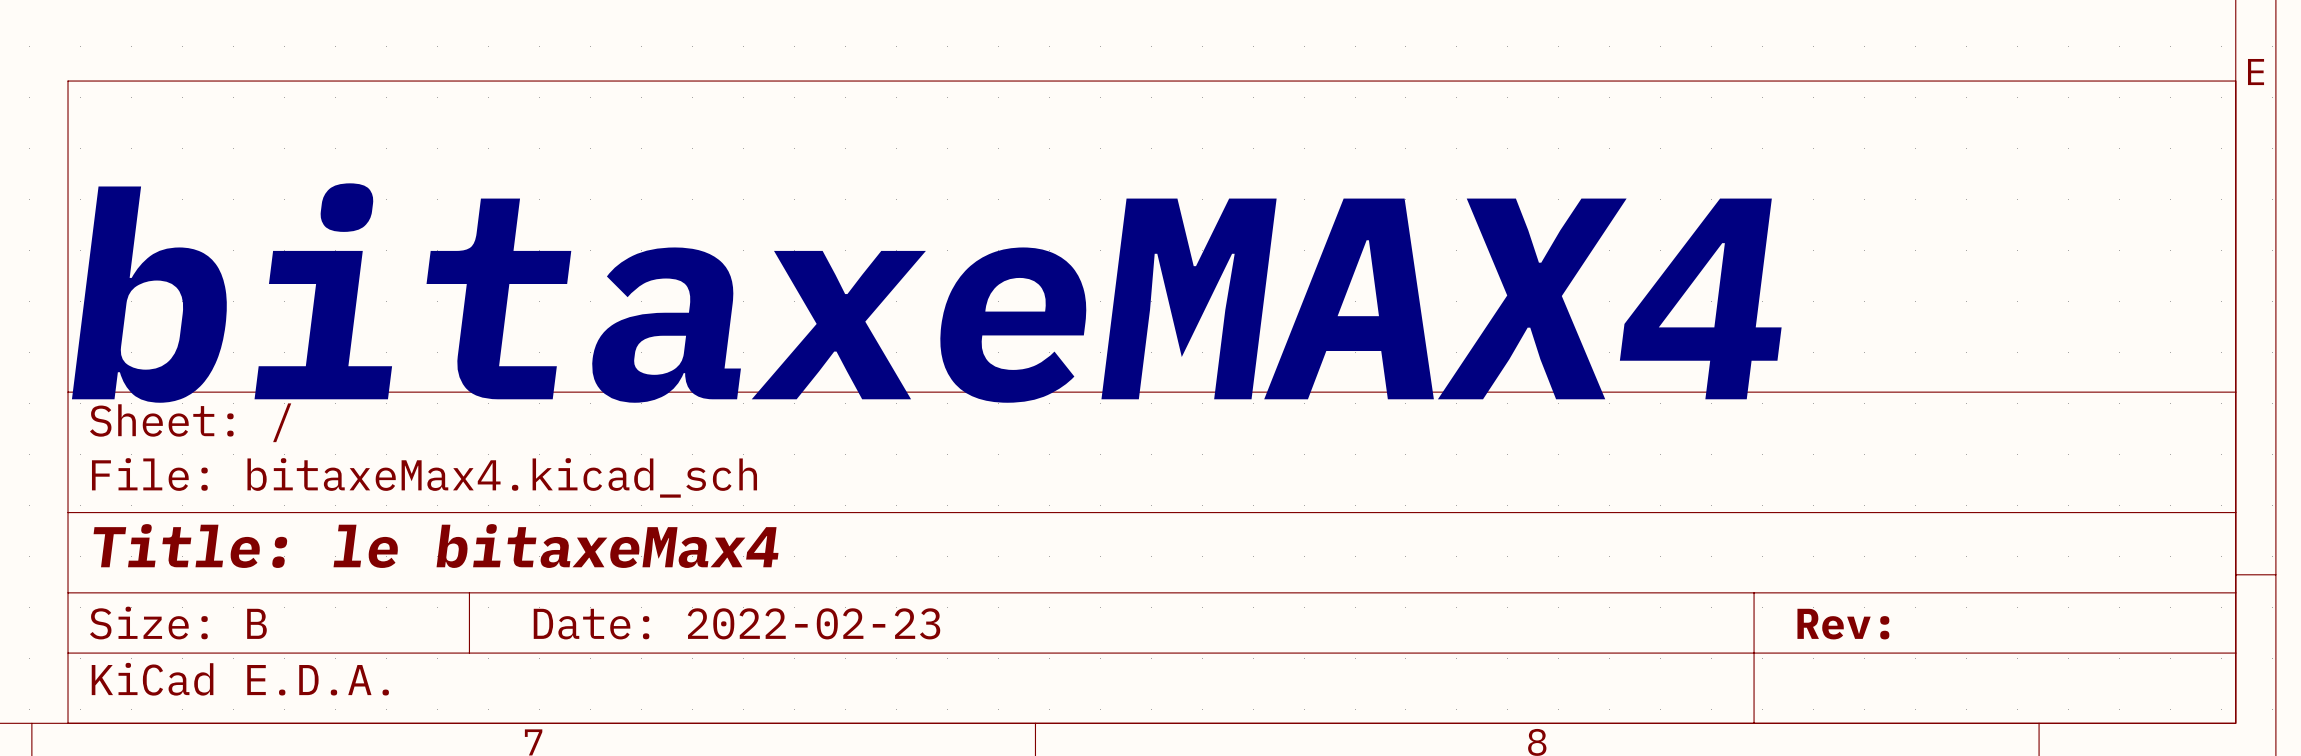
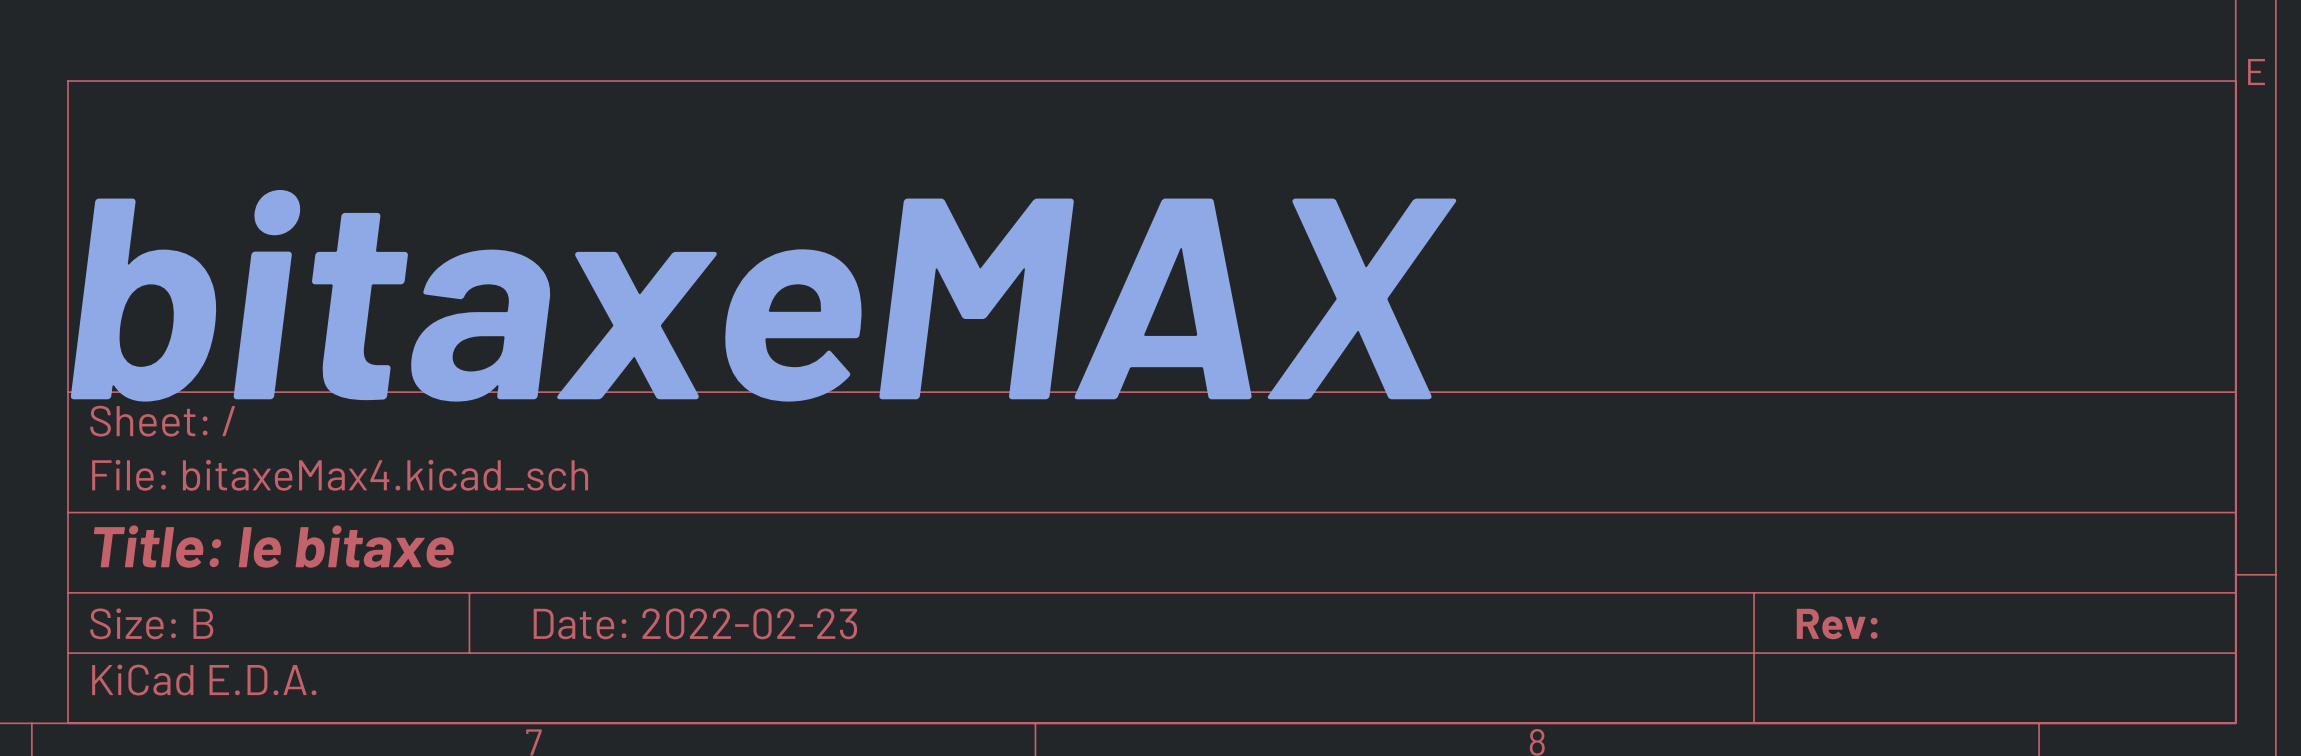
text: bitaxeMAX4 (926, 293) -> bitaxeMAX (763, 295)
title block: Title: le bitaxeMax4 (436, 546) -> Title: le bitaxe (273, 546)

